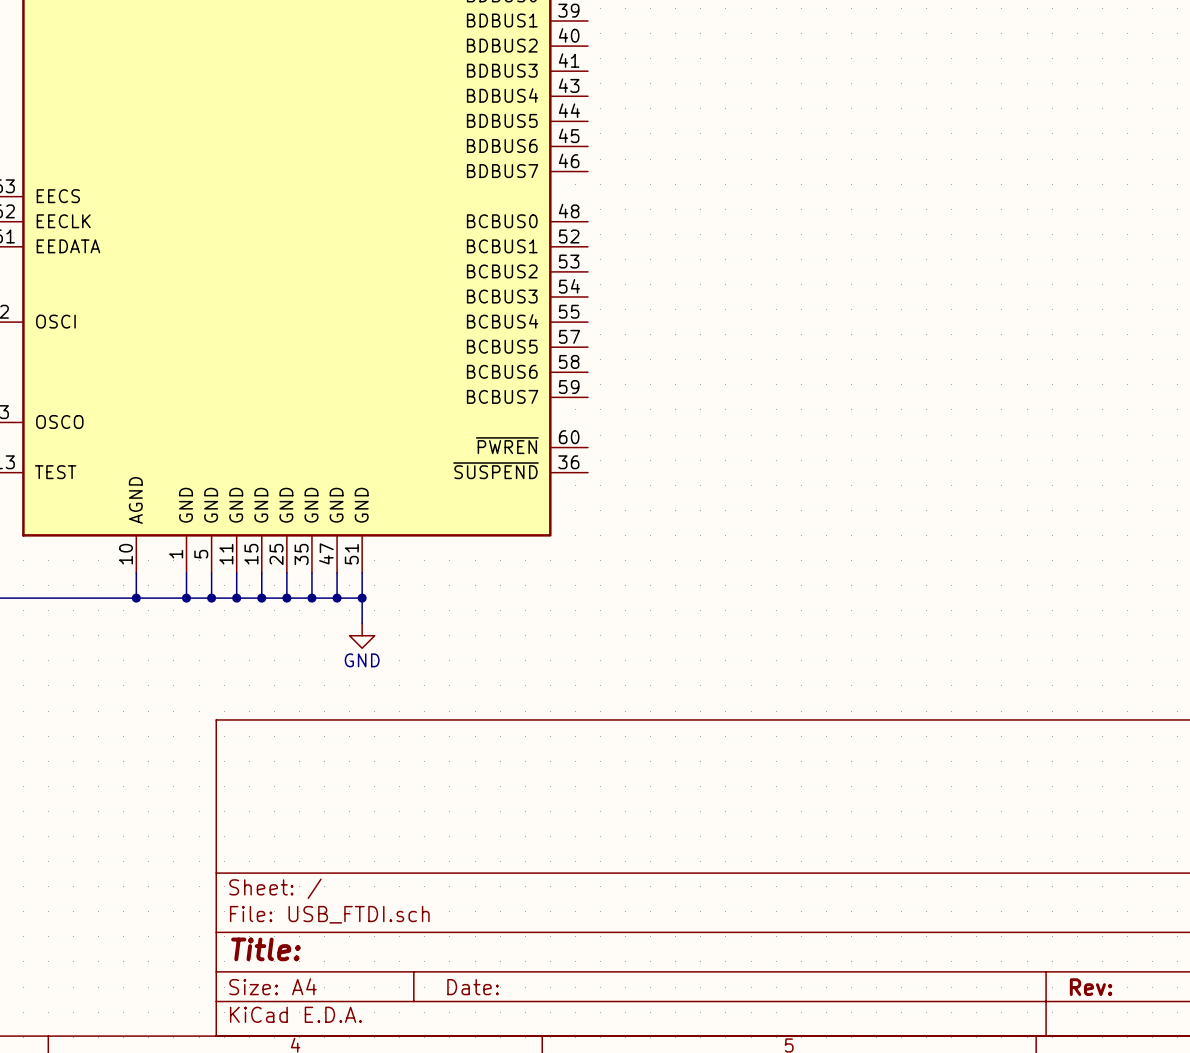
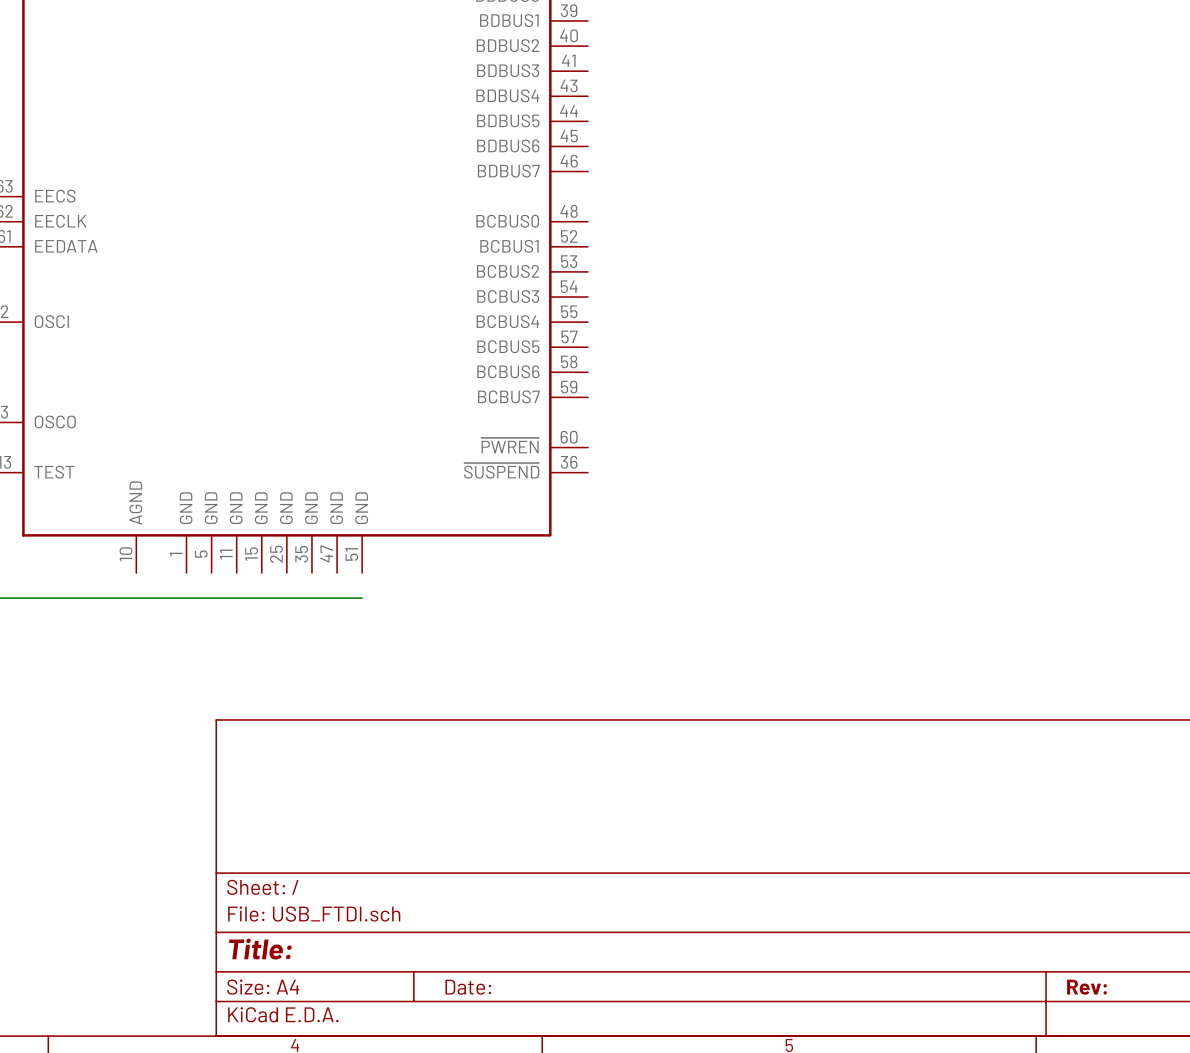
wire: (136, 573) (136, 598) -> none
wire: (186, 573) (186, 598) -> none
wire: (211, 573) (211, 598) -> none
wire: (236, 573) (236, 598) -> none
wire: (261, 573) (261, 598) -> none
wire: (286, 573) (286, 598) -> none
wire: (311, 573) (311, 598) -> none
wire: (337, 573) (337, 598) -> none
wire: (362, 573) (362, 623) -> none
junction: (136, 598) -> none
junction: (186, 598) -> none
junction: (211, 598) -> none
junction: (236, 598) -> none
junction: (261, 598) -> none
junction: (286, 598) -> none
junction: (311, 598) -> none
junction: (337, 598) -> none
junction: (362, 598) -> none
power symbol: GND (362, 635) -> none

